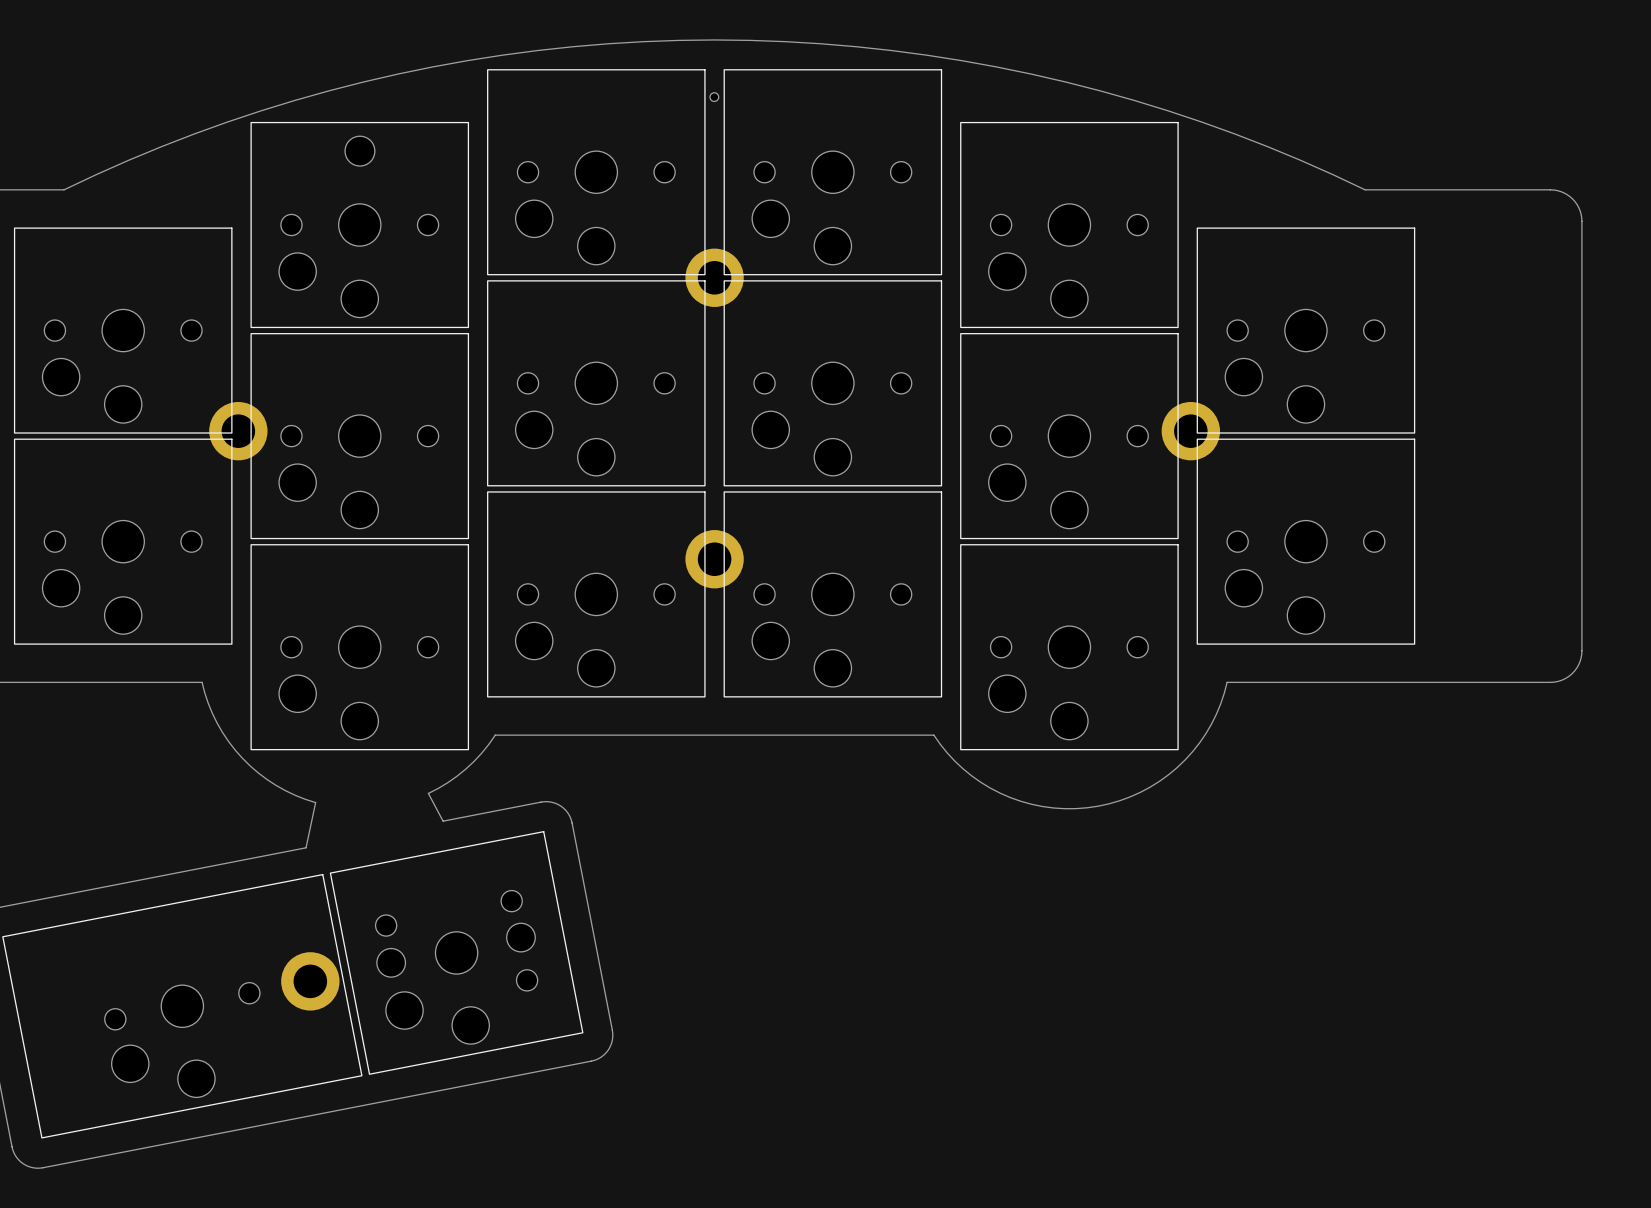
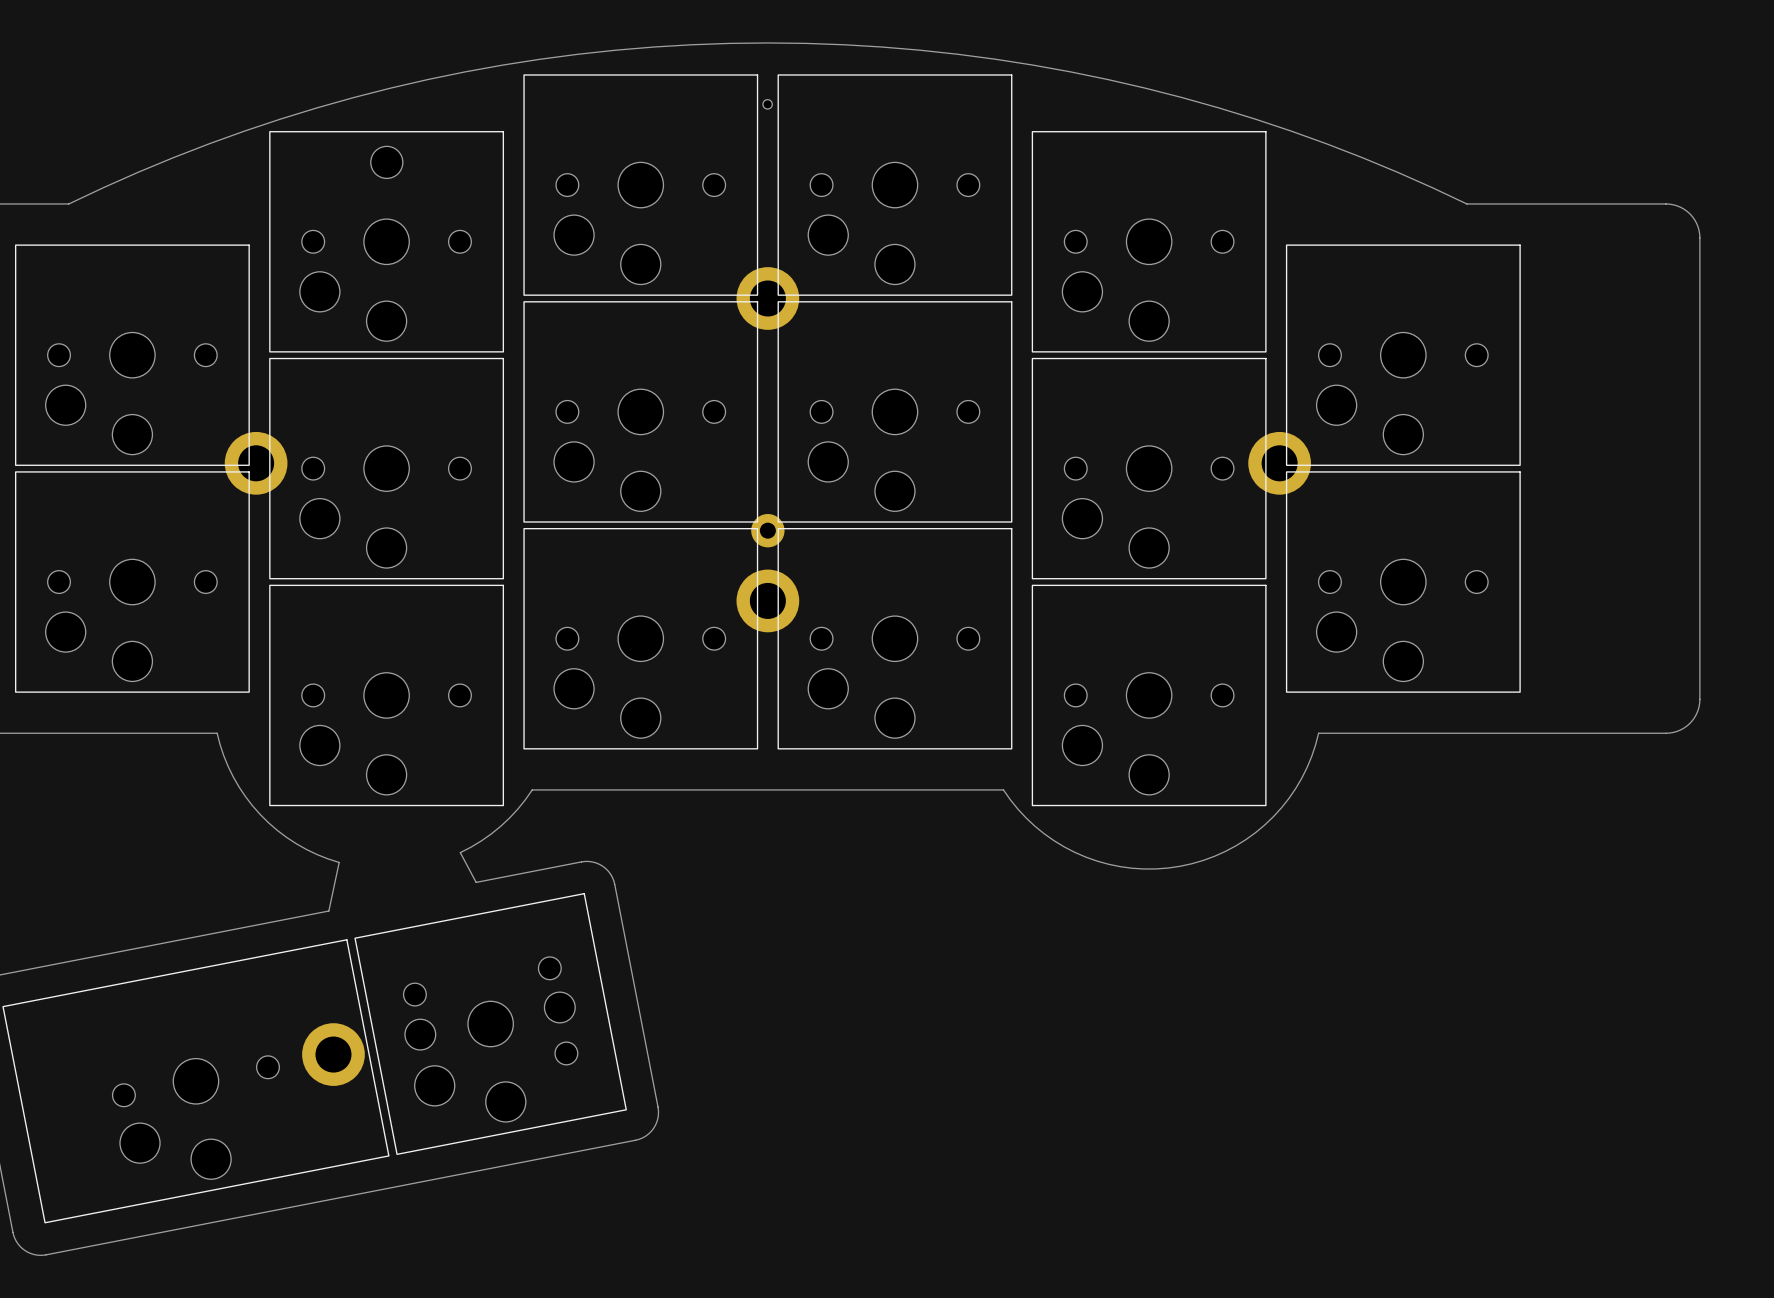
part: none -> (767, 530)

